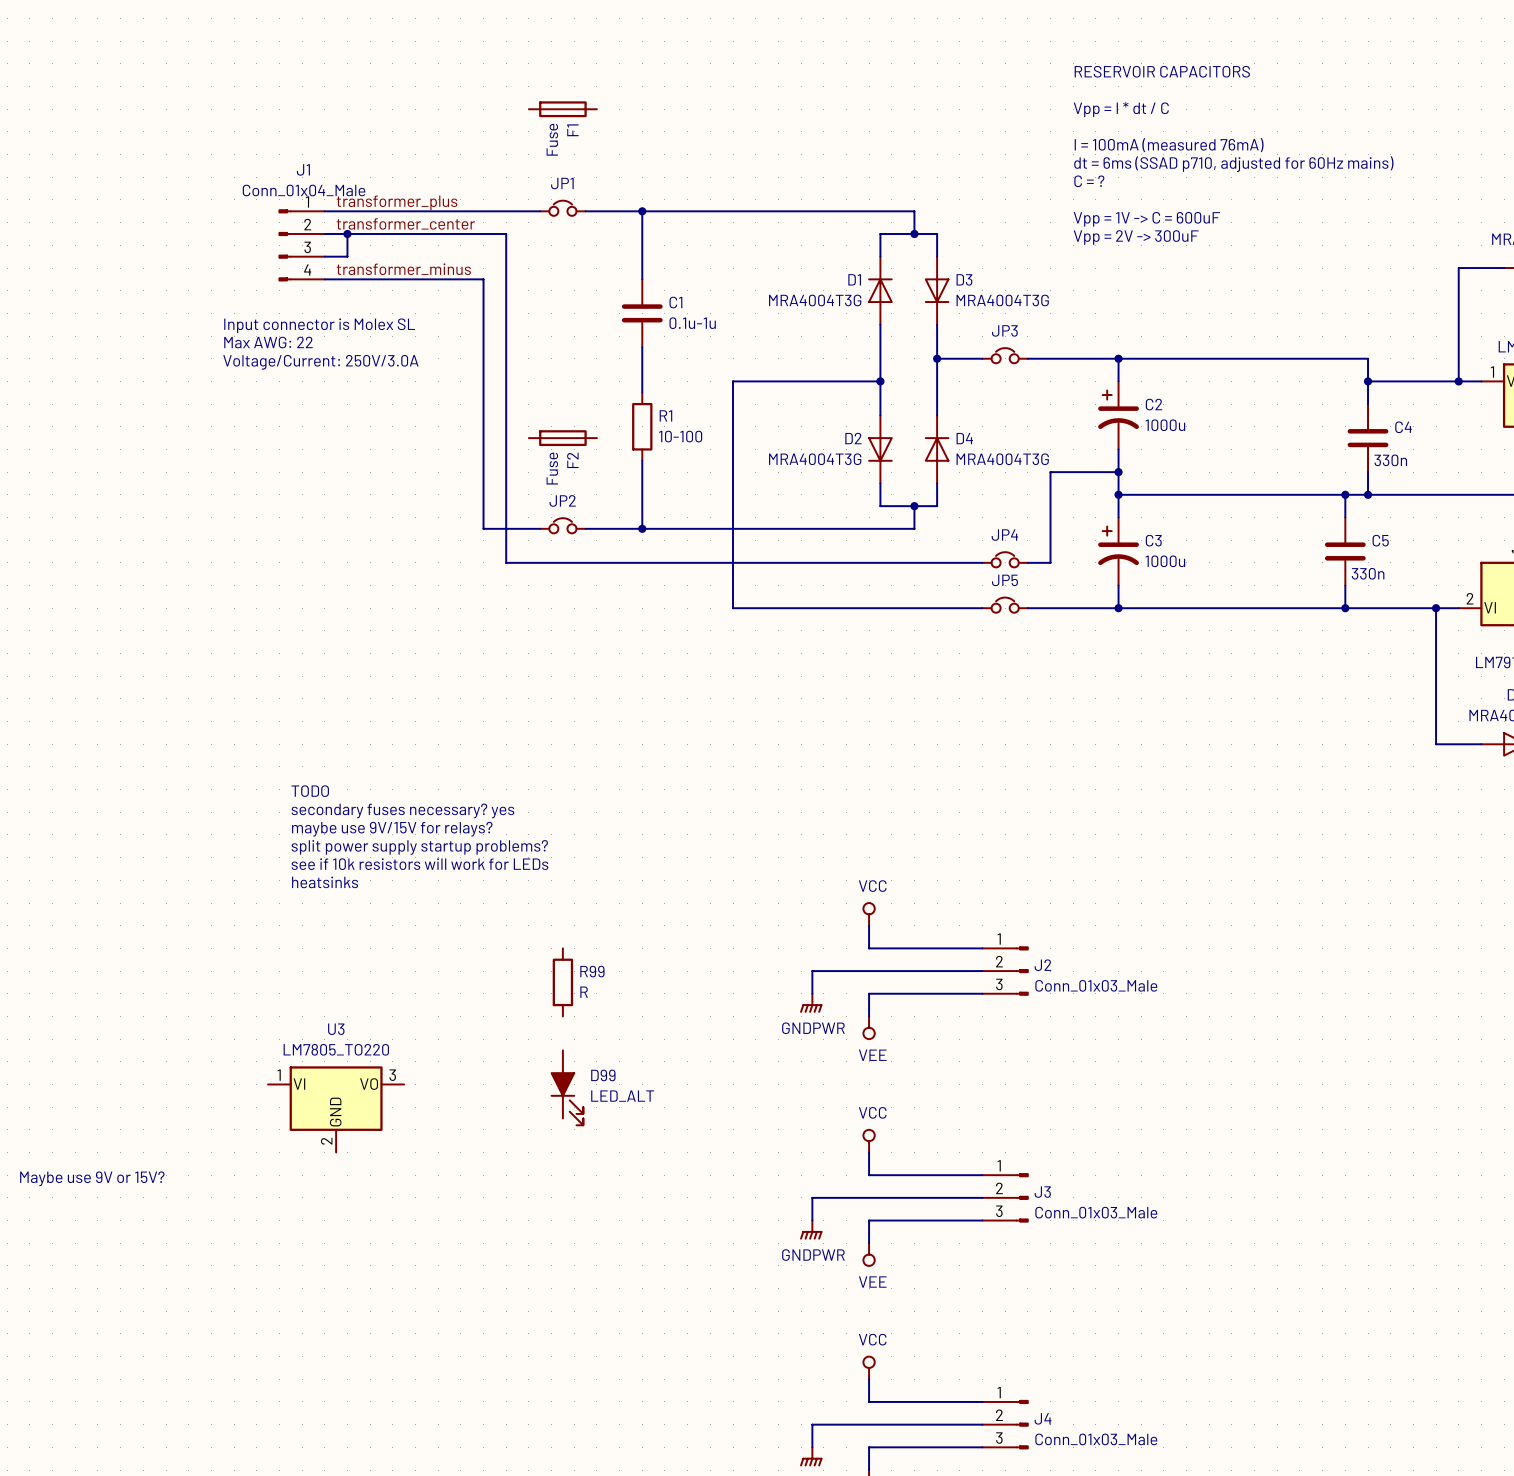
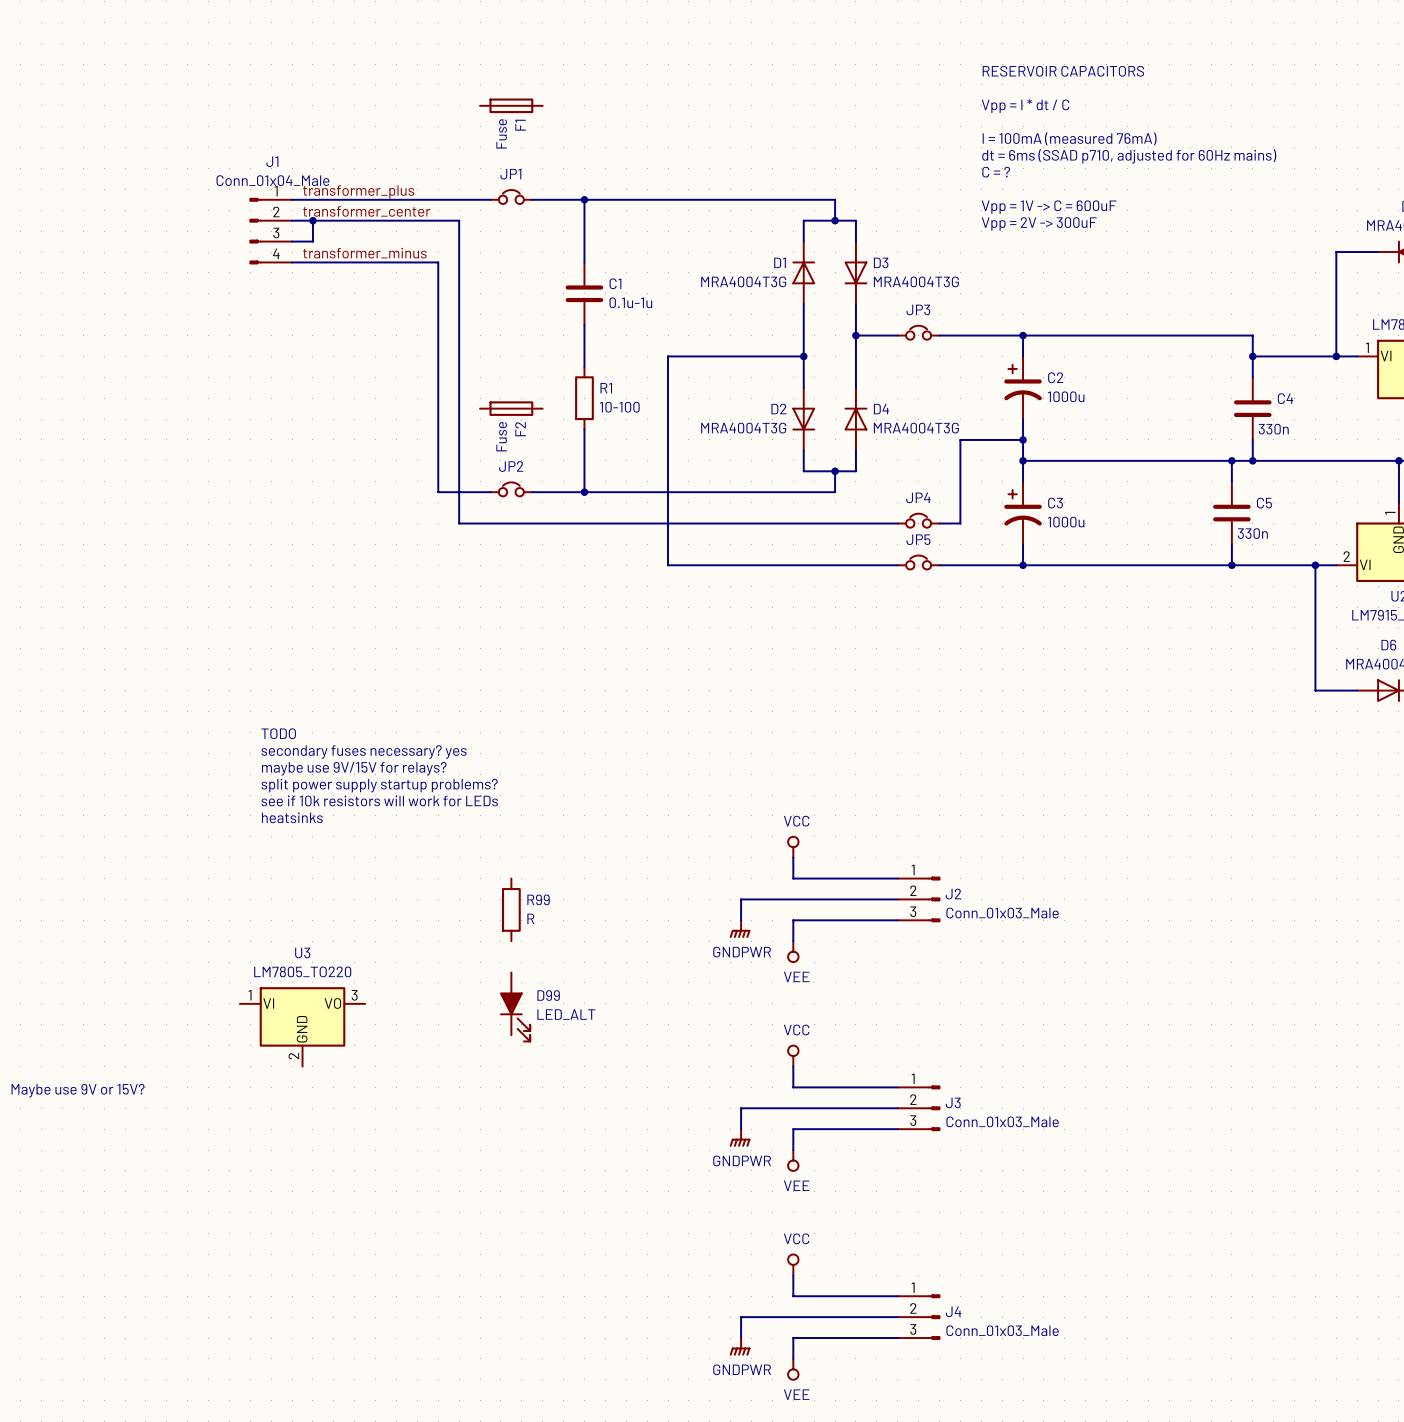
text: Input connector is Molex SL (319, 325) -> none
text: Max AWG: 22 (268, 342) -> none
text: Voltage/Current: 250V/3.0A (320, 362) -> none

